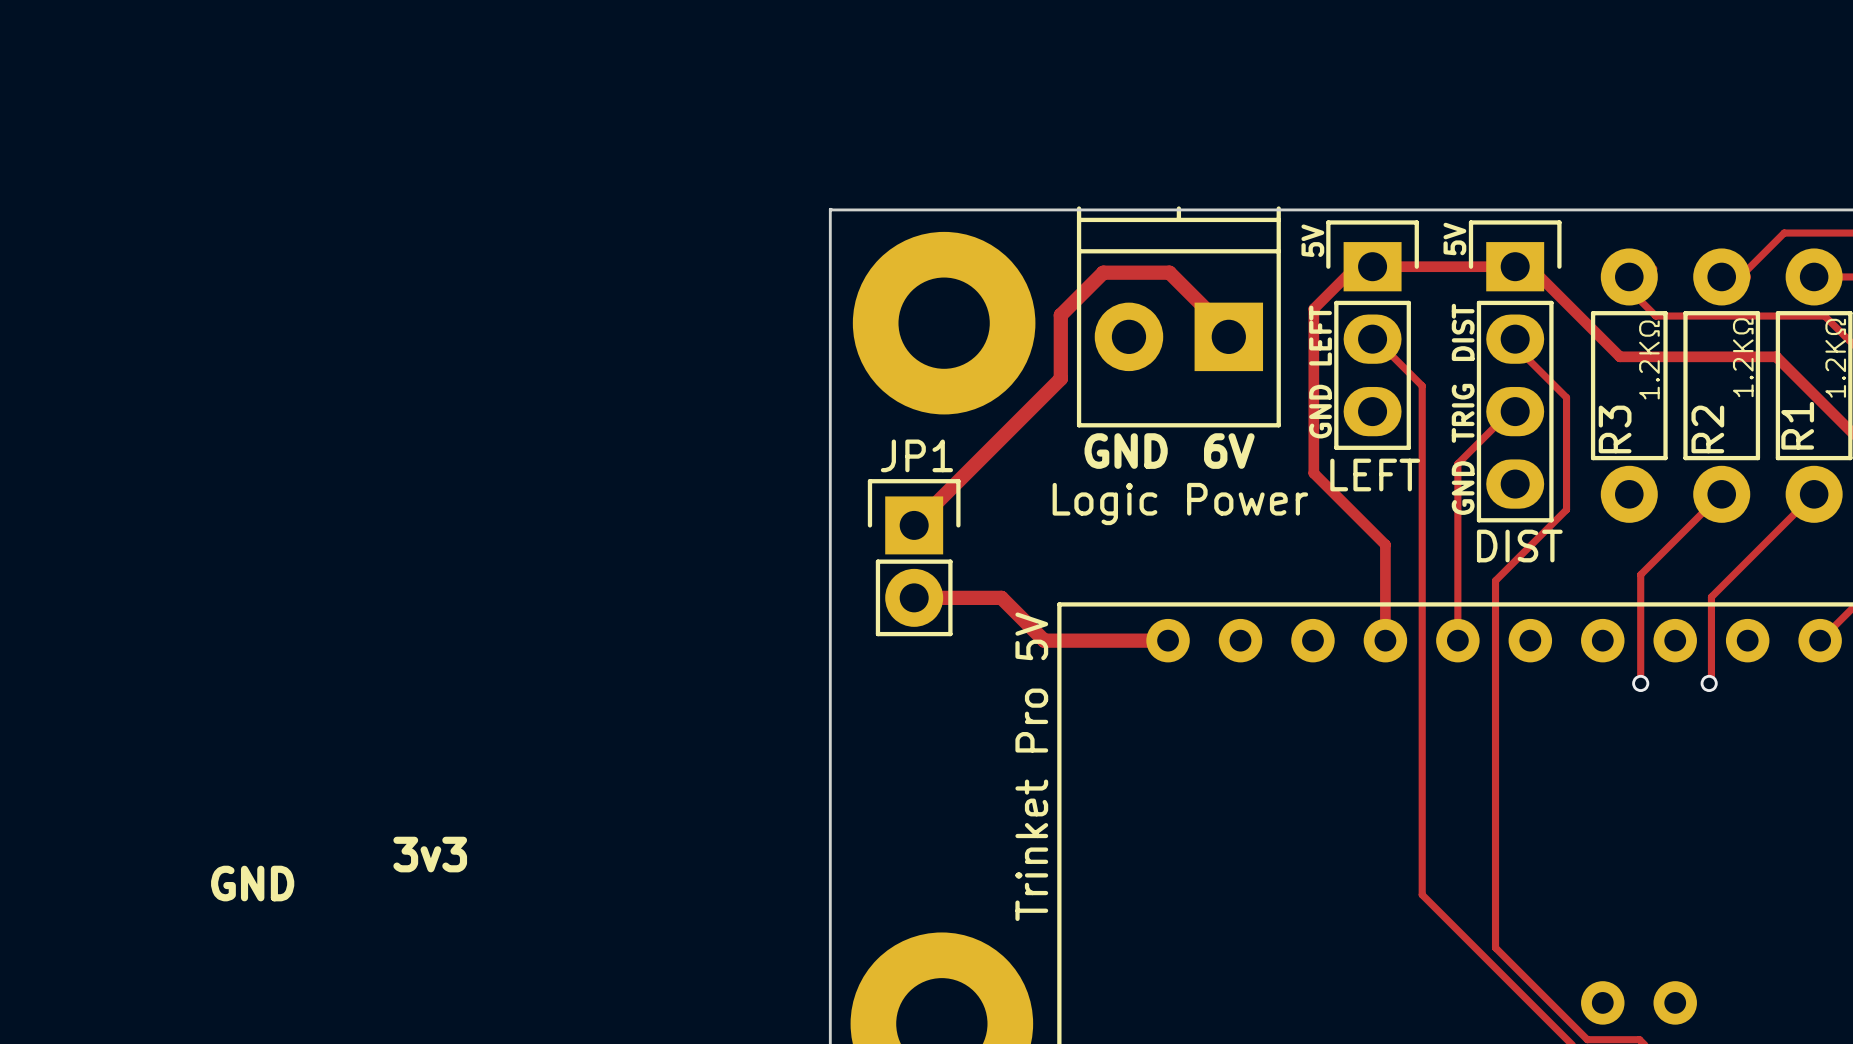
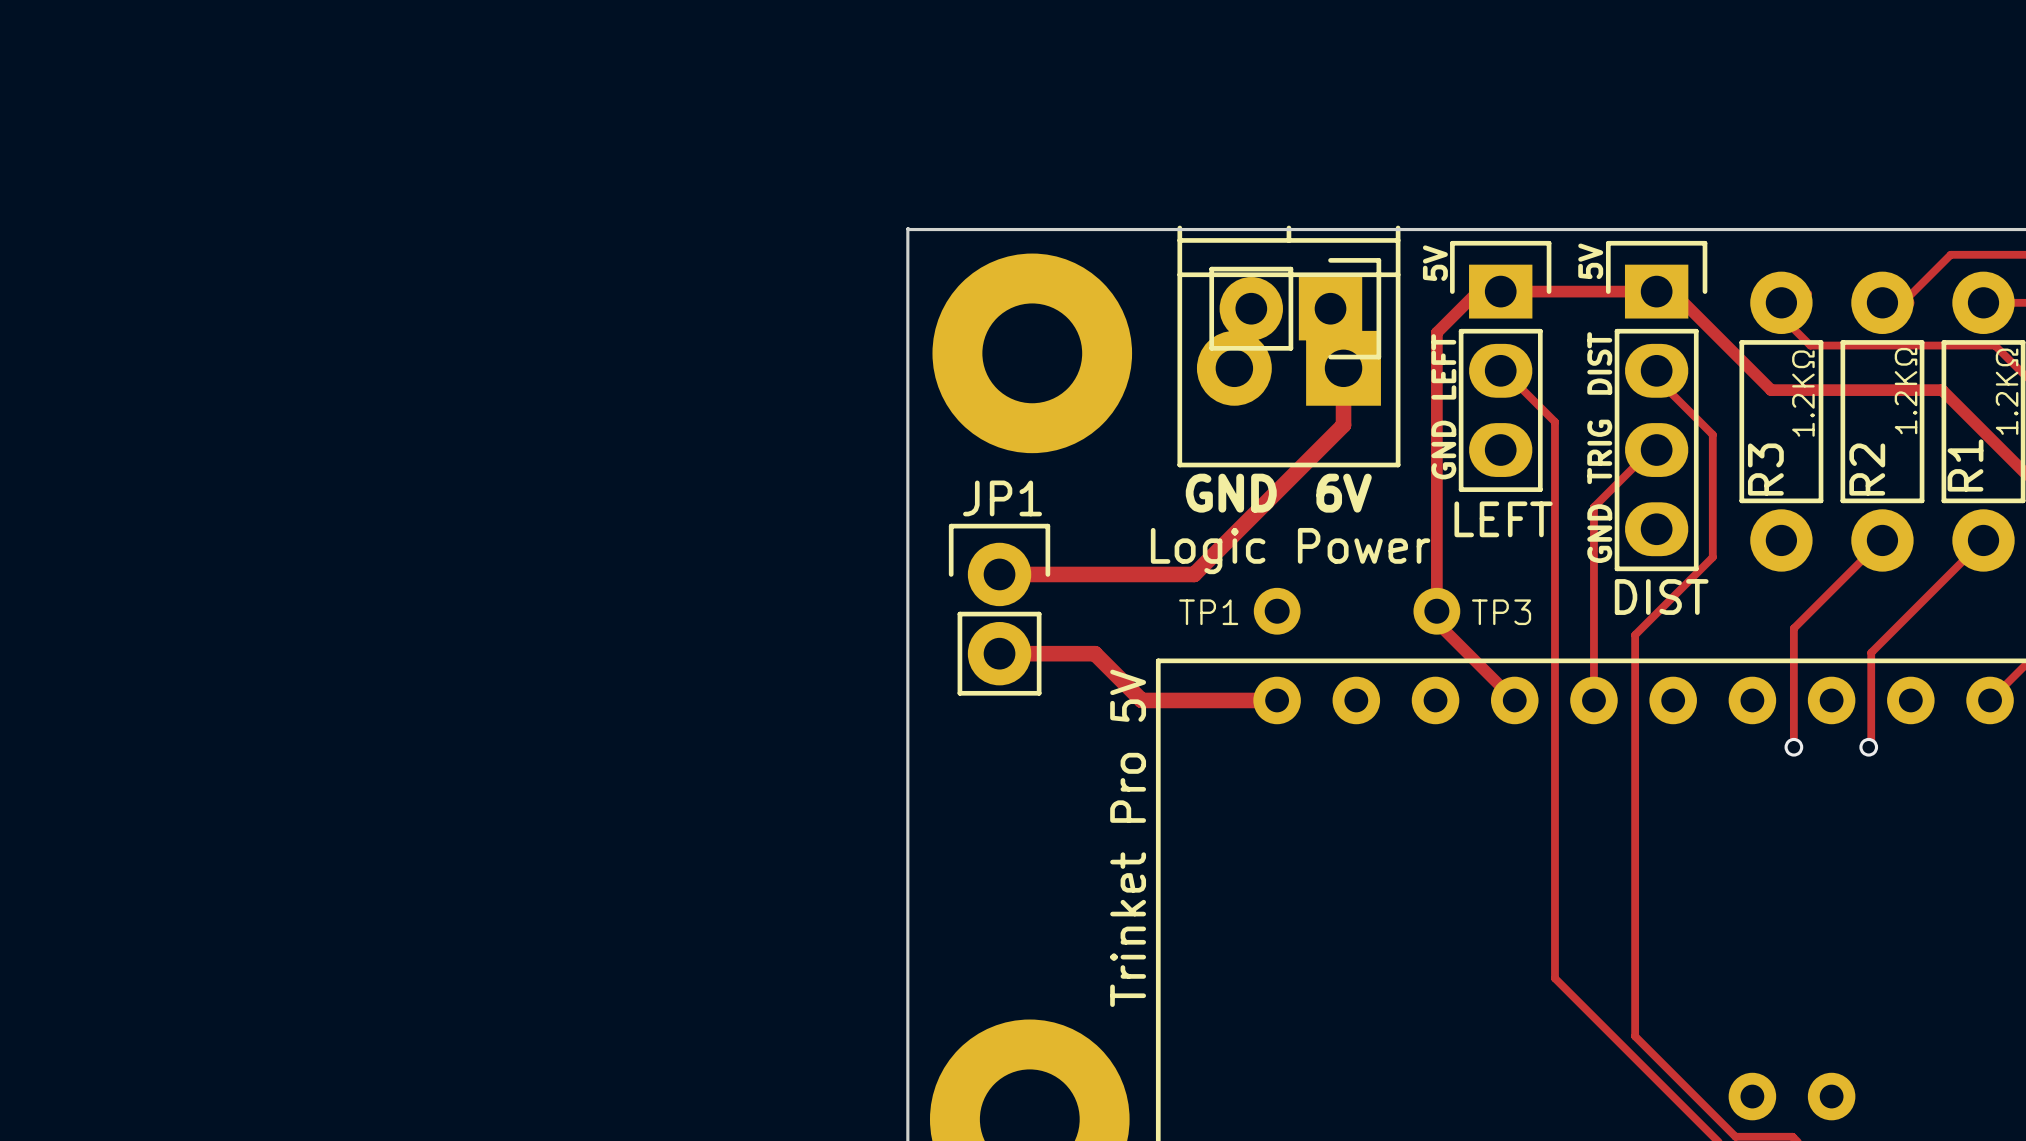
track: (1356, 266) (1313, 308) (1313, 473) (1385, 544) (1385, 640) -> (1482, 291) (1478, 291) (1436, 332) (1436, 622) (1514, 700)
part: none -> (1295, 308)
track: (1228, 332) (1169, 272) (1103, 272) (1060, 315) (1060, 378) (914, 525) -> (1343, 368) (1343, 425) (1194, 574) (999, 574)
JP1 footprint: [867, 479, 961, 637] -> [948, 523, 1051, 696]
TP1: none -> (1277, 611)
TP3: none -> (1436, 611)
text: 3v3 (430, 854) -> none
text: GND (252, 883) -> none

